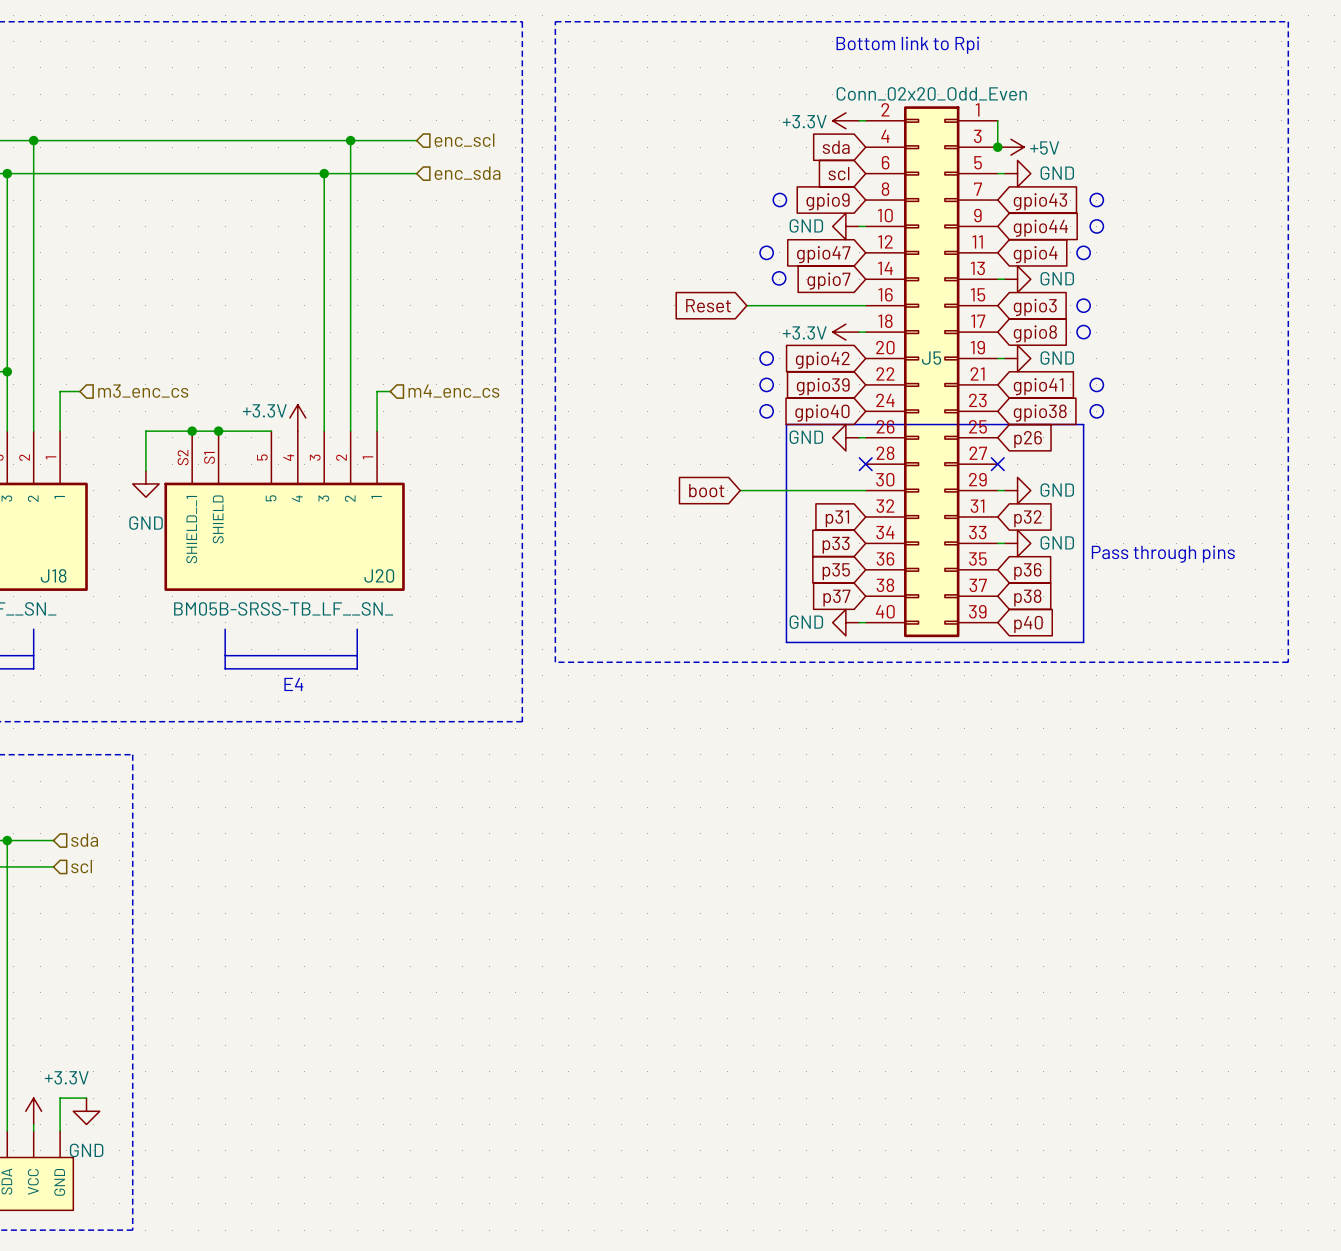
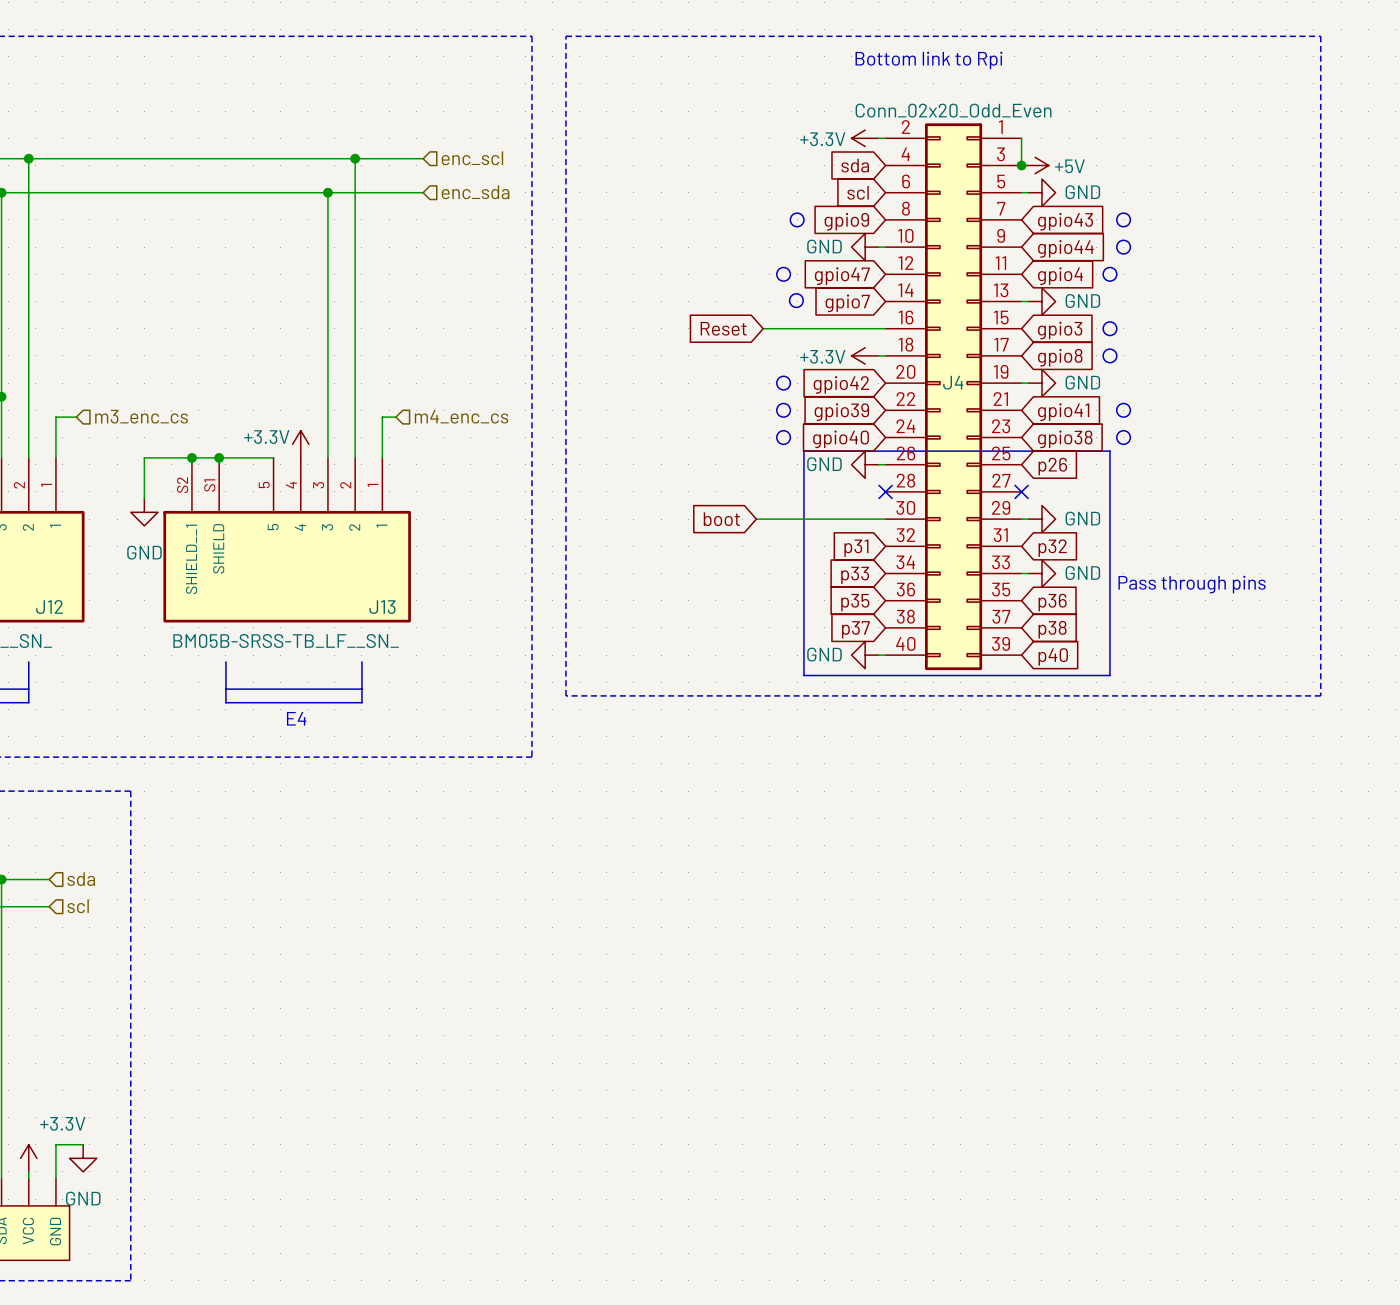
J5 name: J5 (931, 358) -> J4 (953, 382)
J18 name: J18 (53, 575) -> J12 (49, 607)
J20 name: J20 (379, 575) -> J13 (382, 607)

